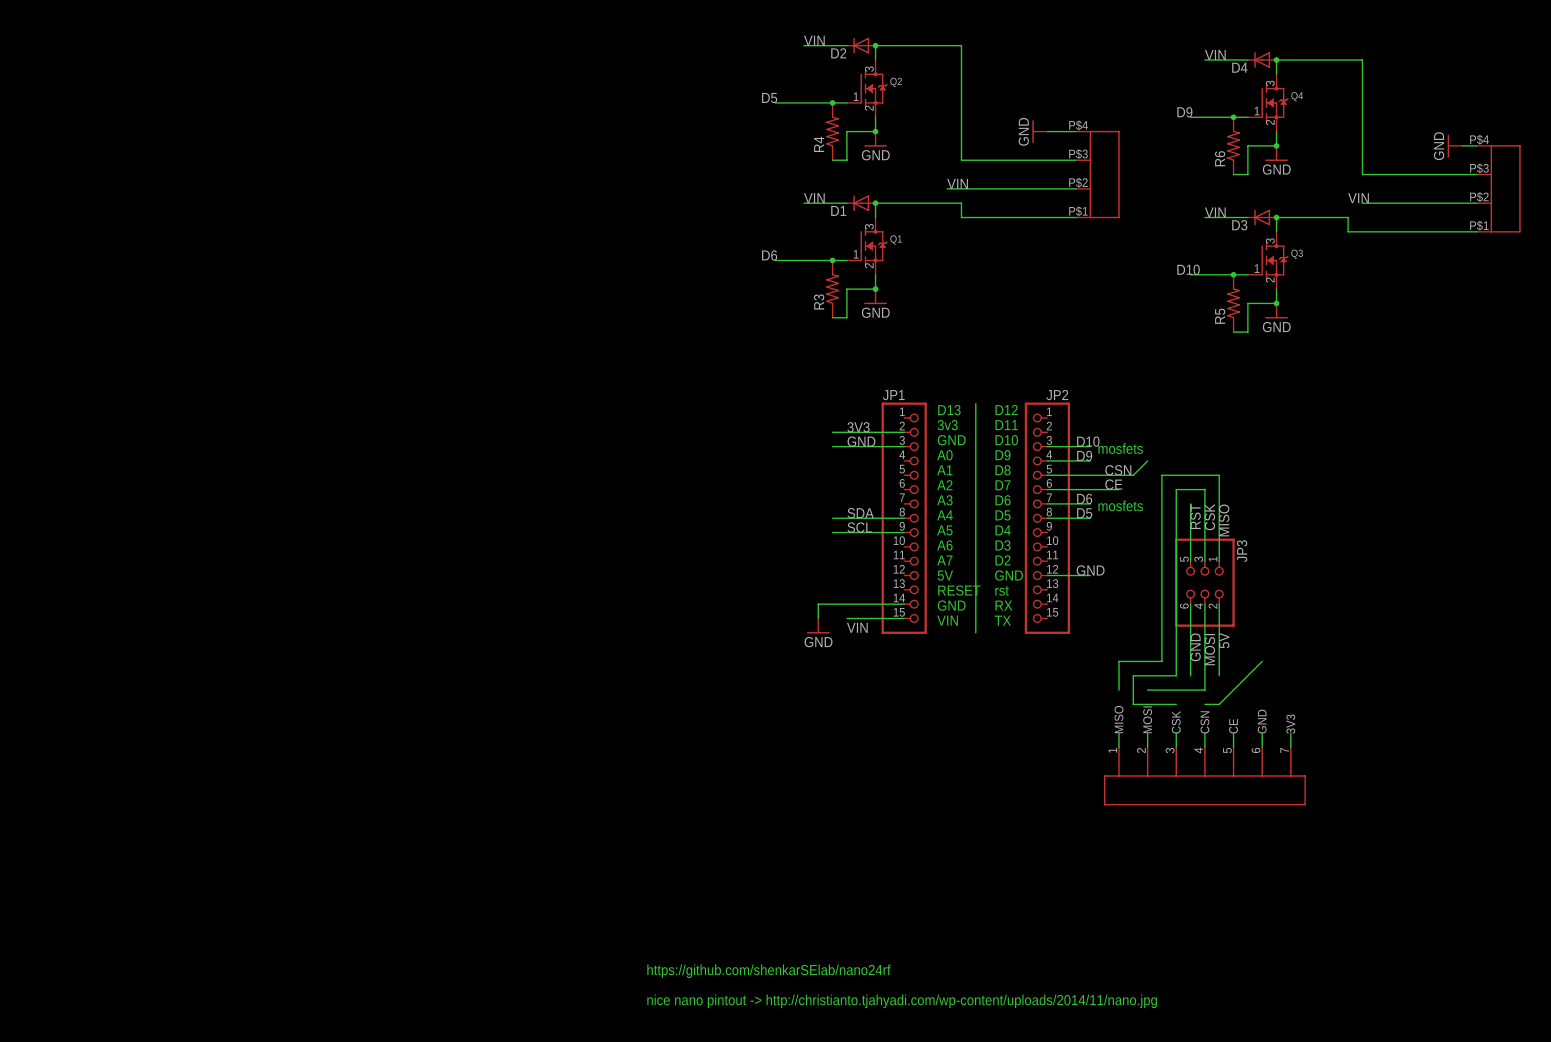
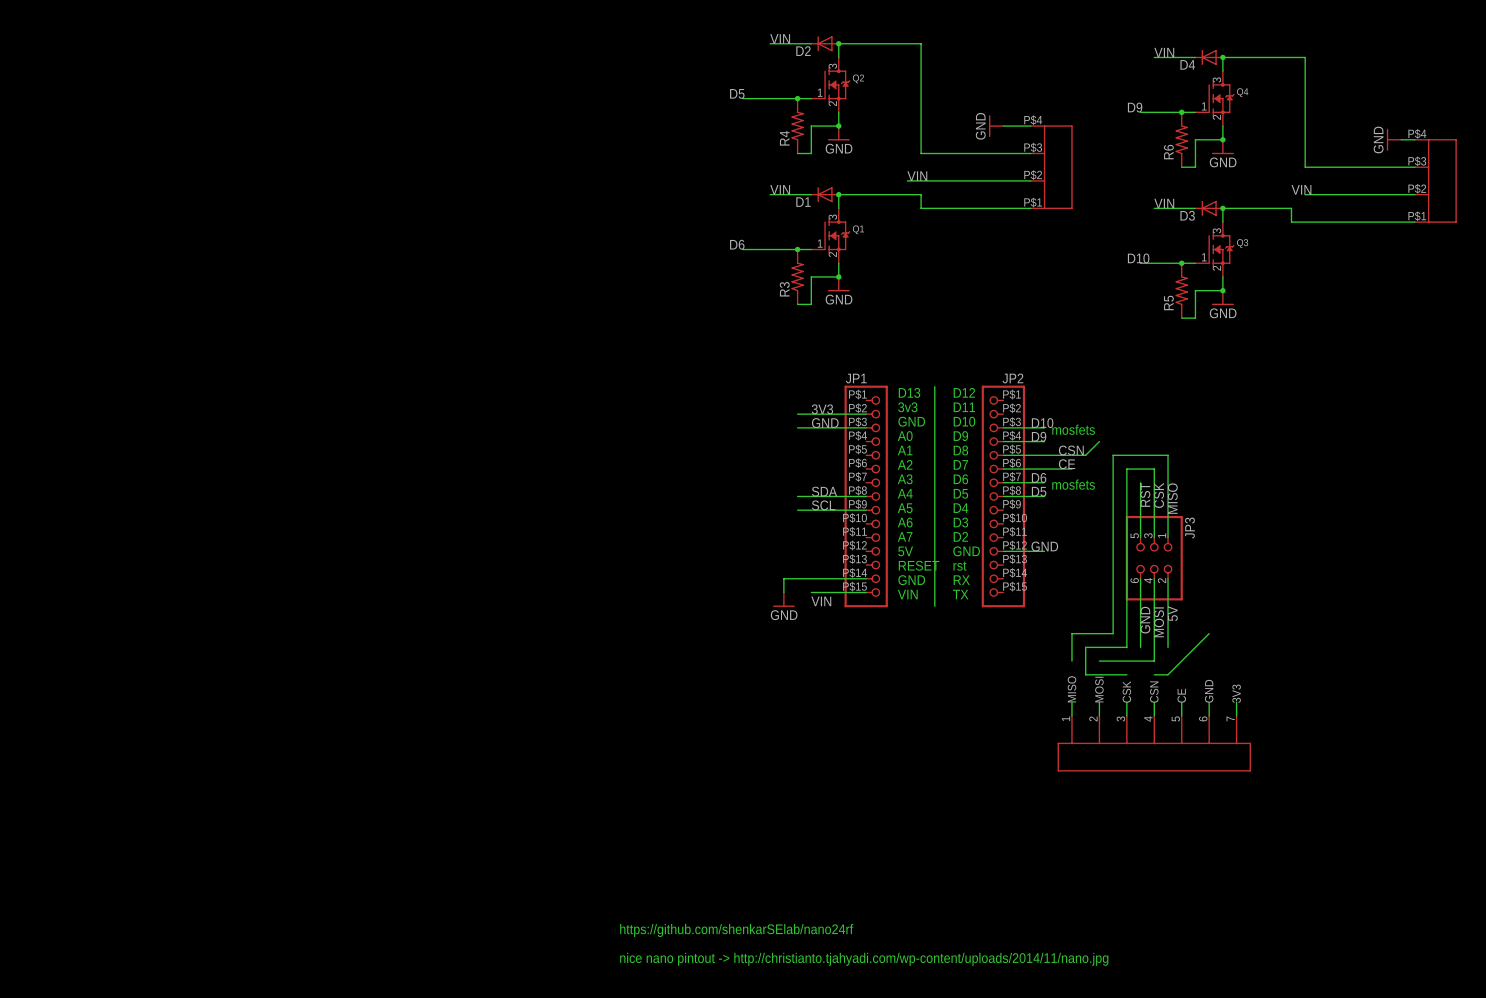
JP1 symbol: [881, 402, 927, 634] -> [844, 385, 888, 608]
JP2 symbol: [1024, 402, 1071, 634] -> [981, 385, 1026, 608]

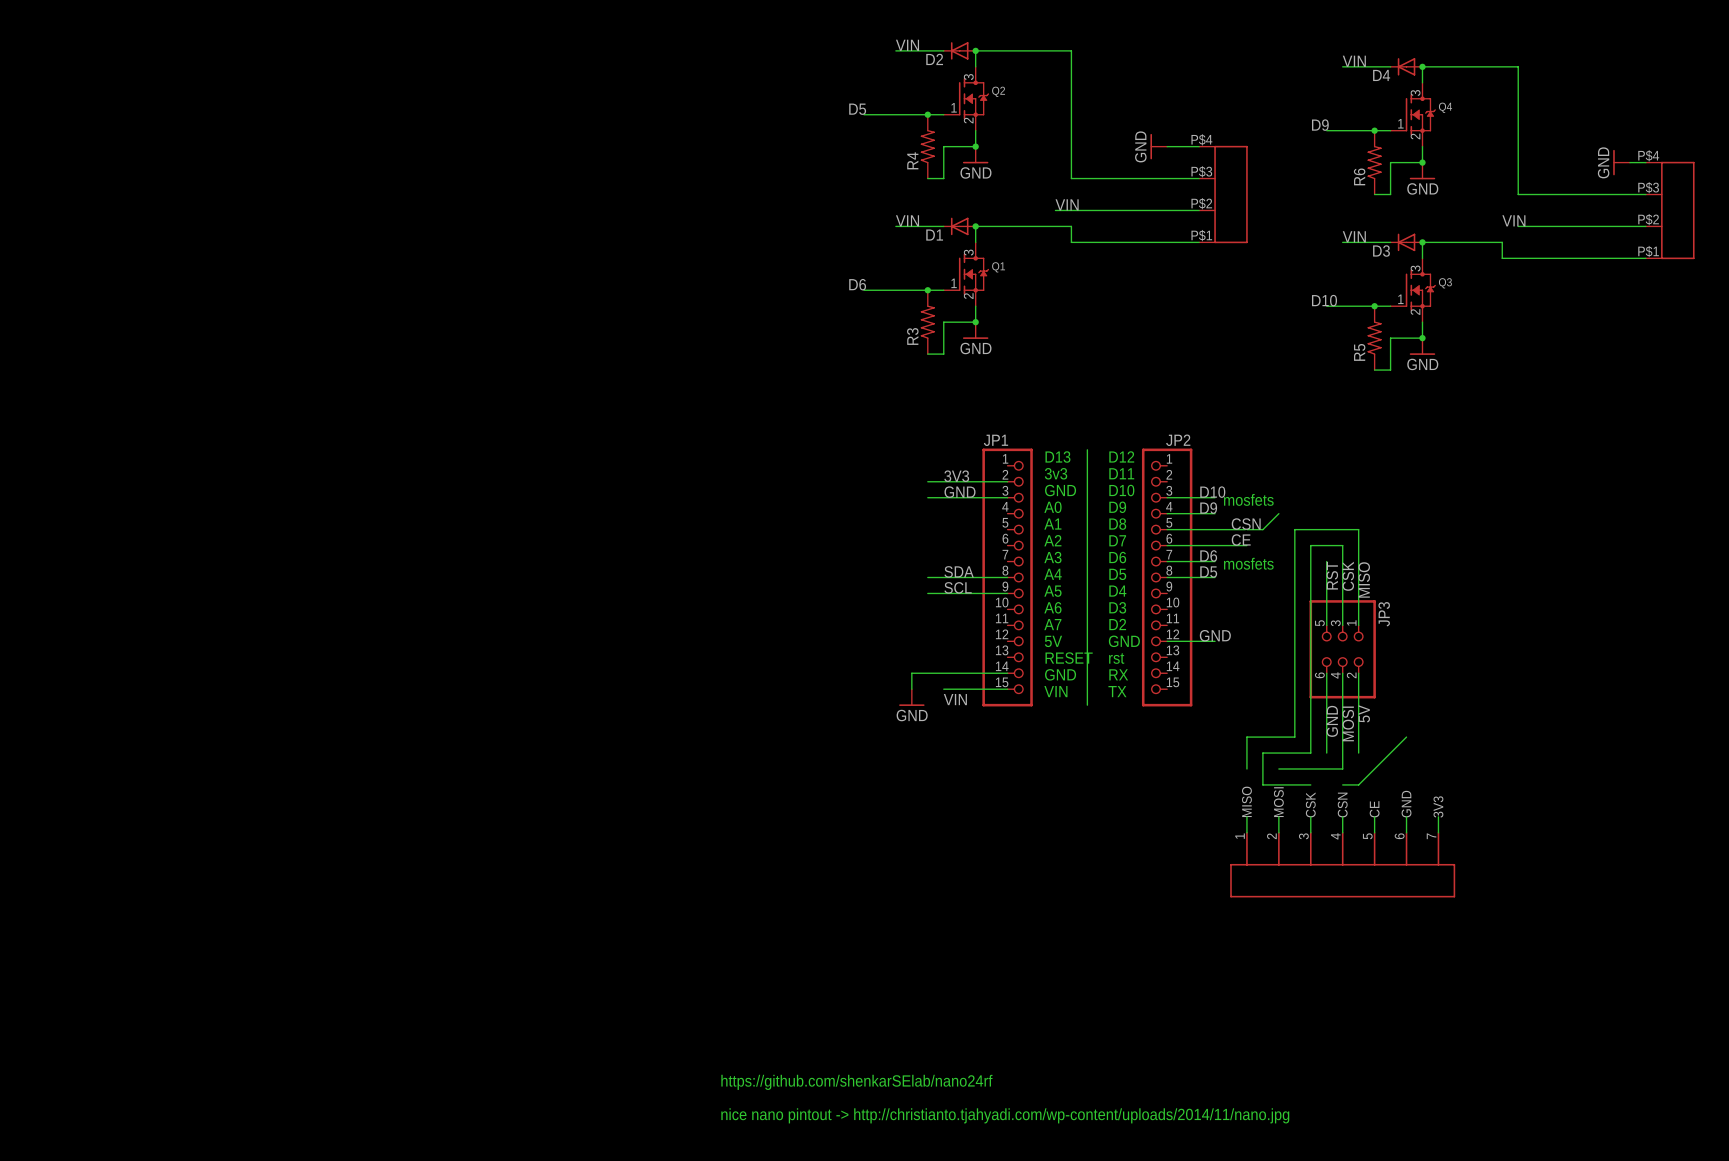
JP1 symbol: [844, 385, 888, 608] -> [982, 448, 1033, 707]
JP2 symbol: [981, 385, 1026, 608] -> [1141, 448, 1193, 707]

